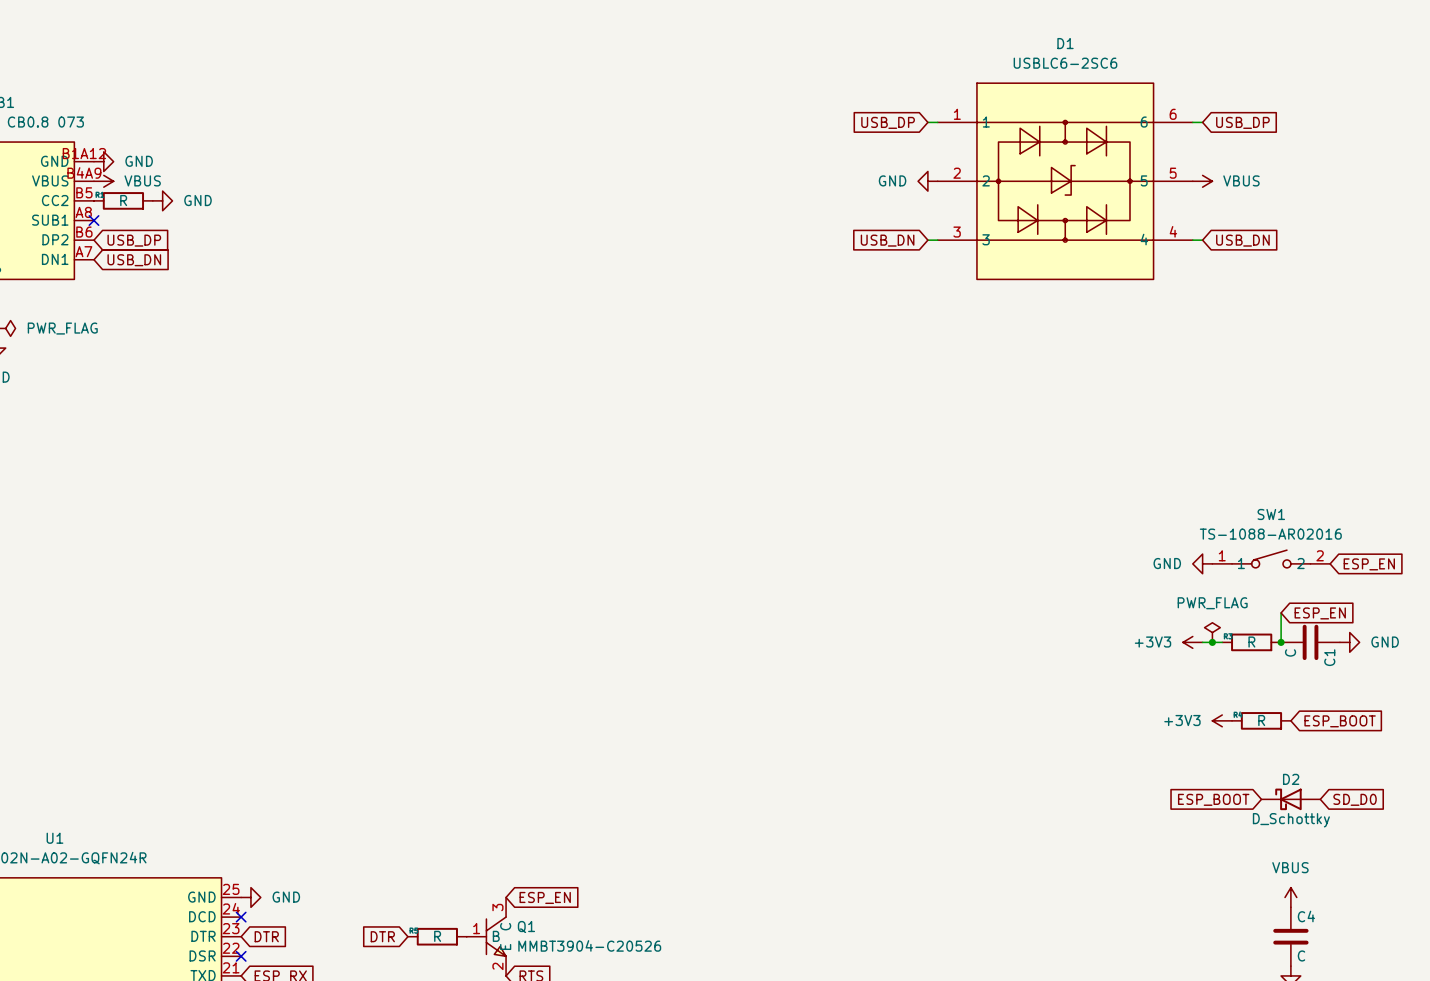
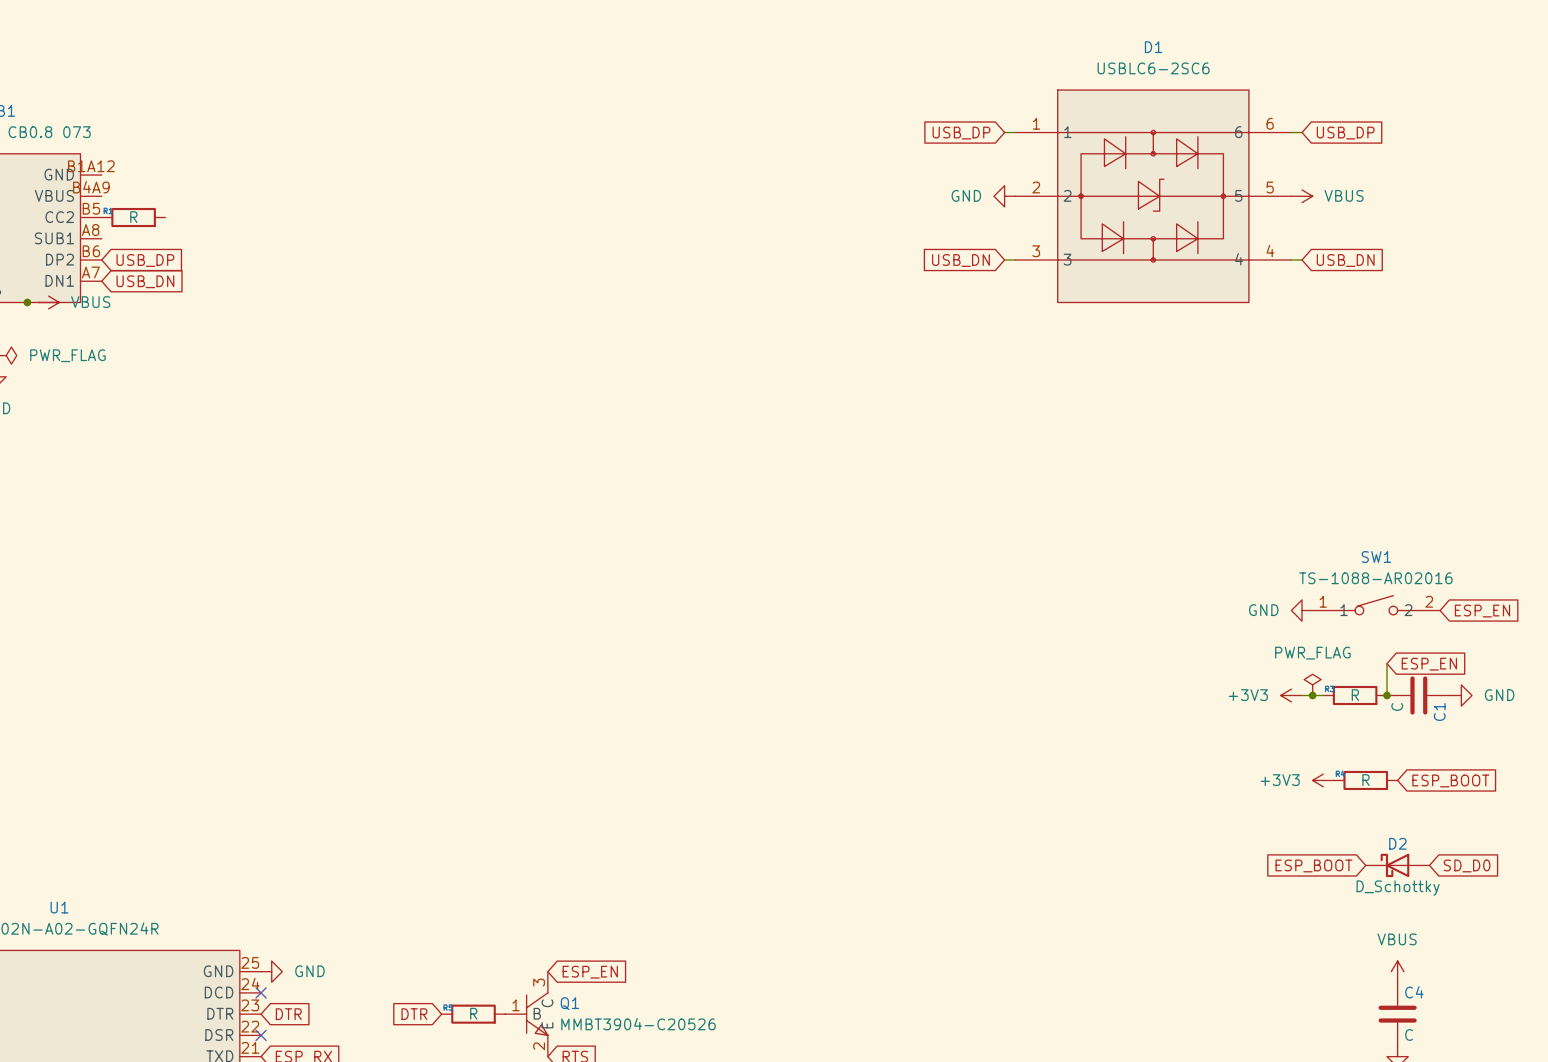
power symbol: GND (103, 161) -> none
power symbol position: VBUS (103, 181) -> VBUS (48, 302)
power symbol: GND (162, 200) -> none
no-connect mark: (93, 220) -> none
junction: none -> (27, 302)

